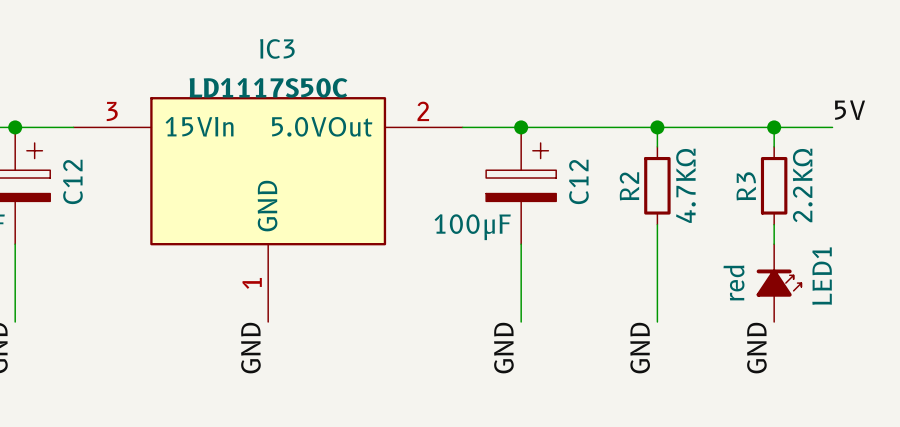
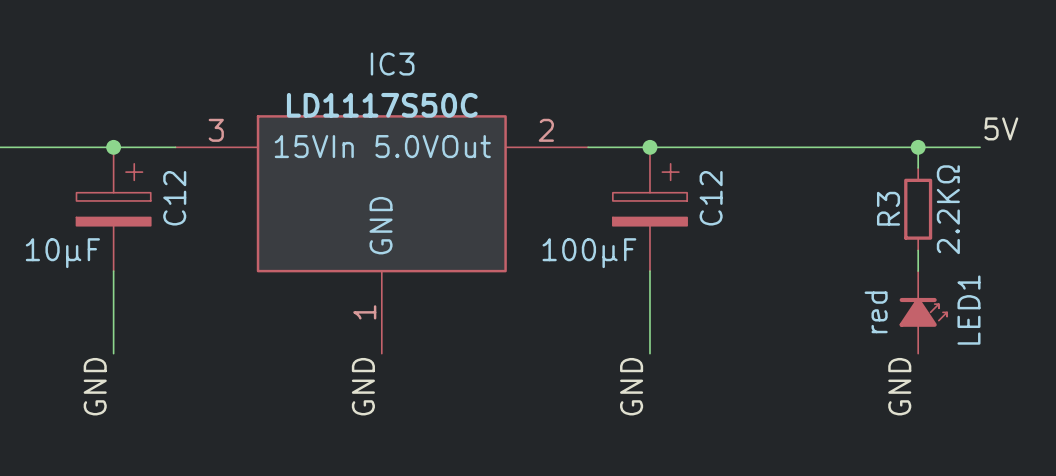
wire: (657, 127) (657, 146) -> none
junction: (657, 127) -> none
R2: 4.7KΩ (657, 185) -> none
wire: (657, 224) (657, 322) -> none
label: GND (640, 348) -> none

